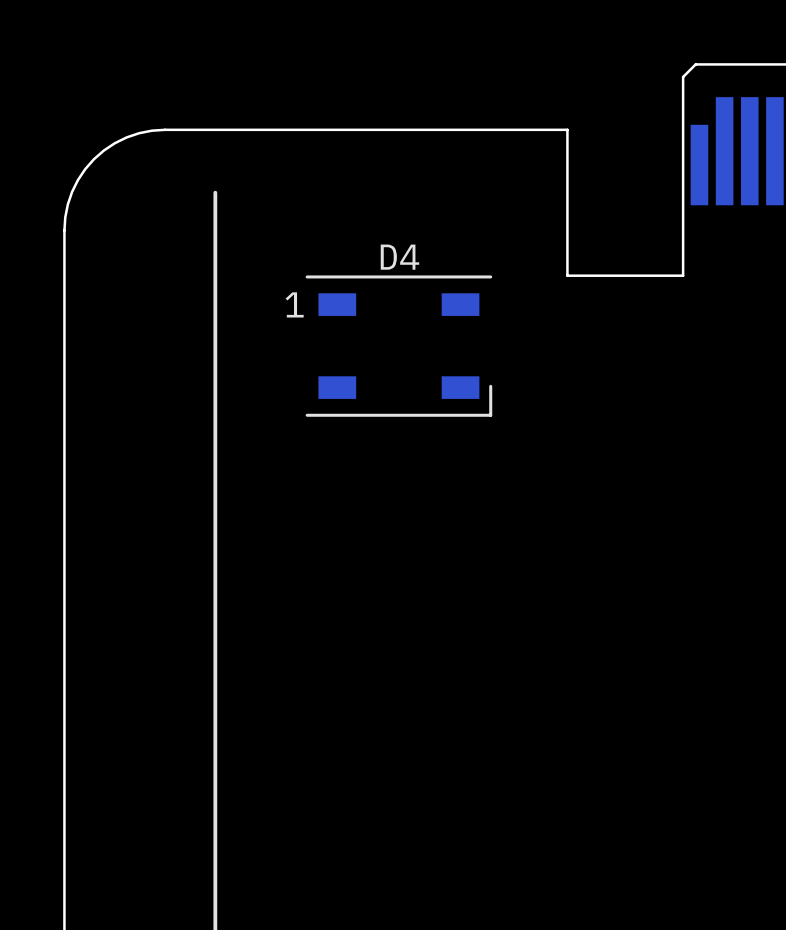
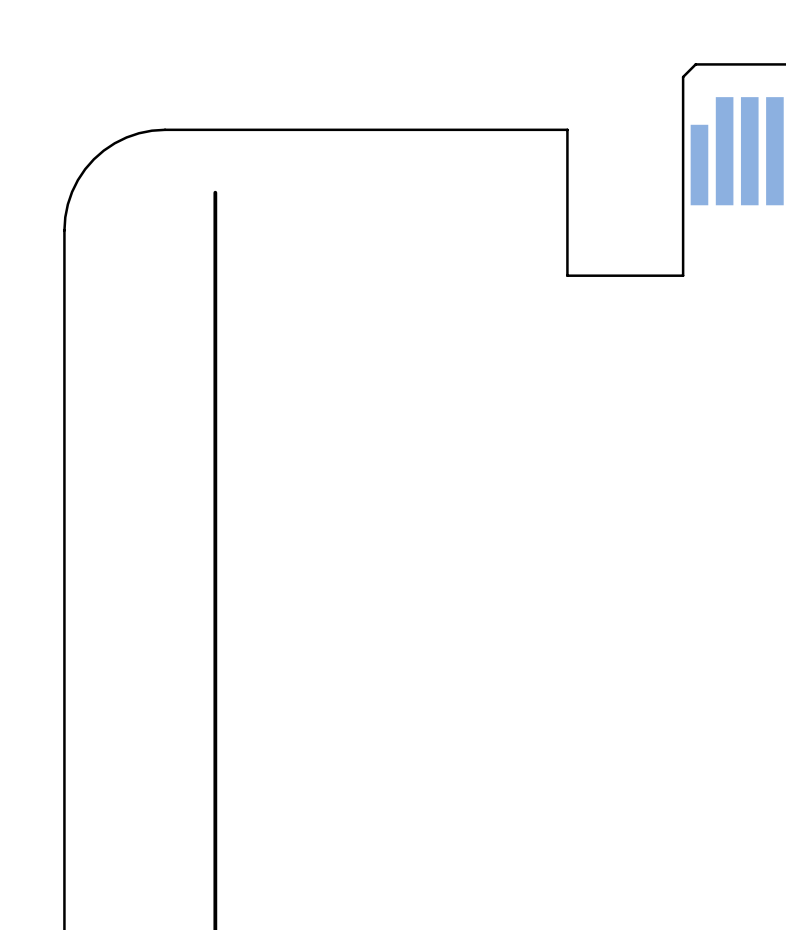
D4: (398, 346) -> none

